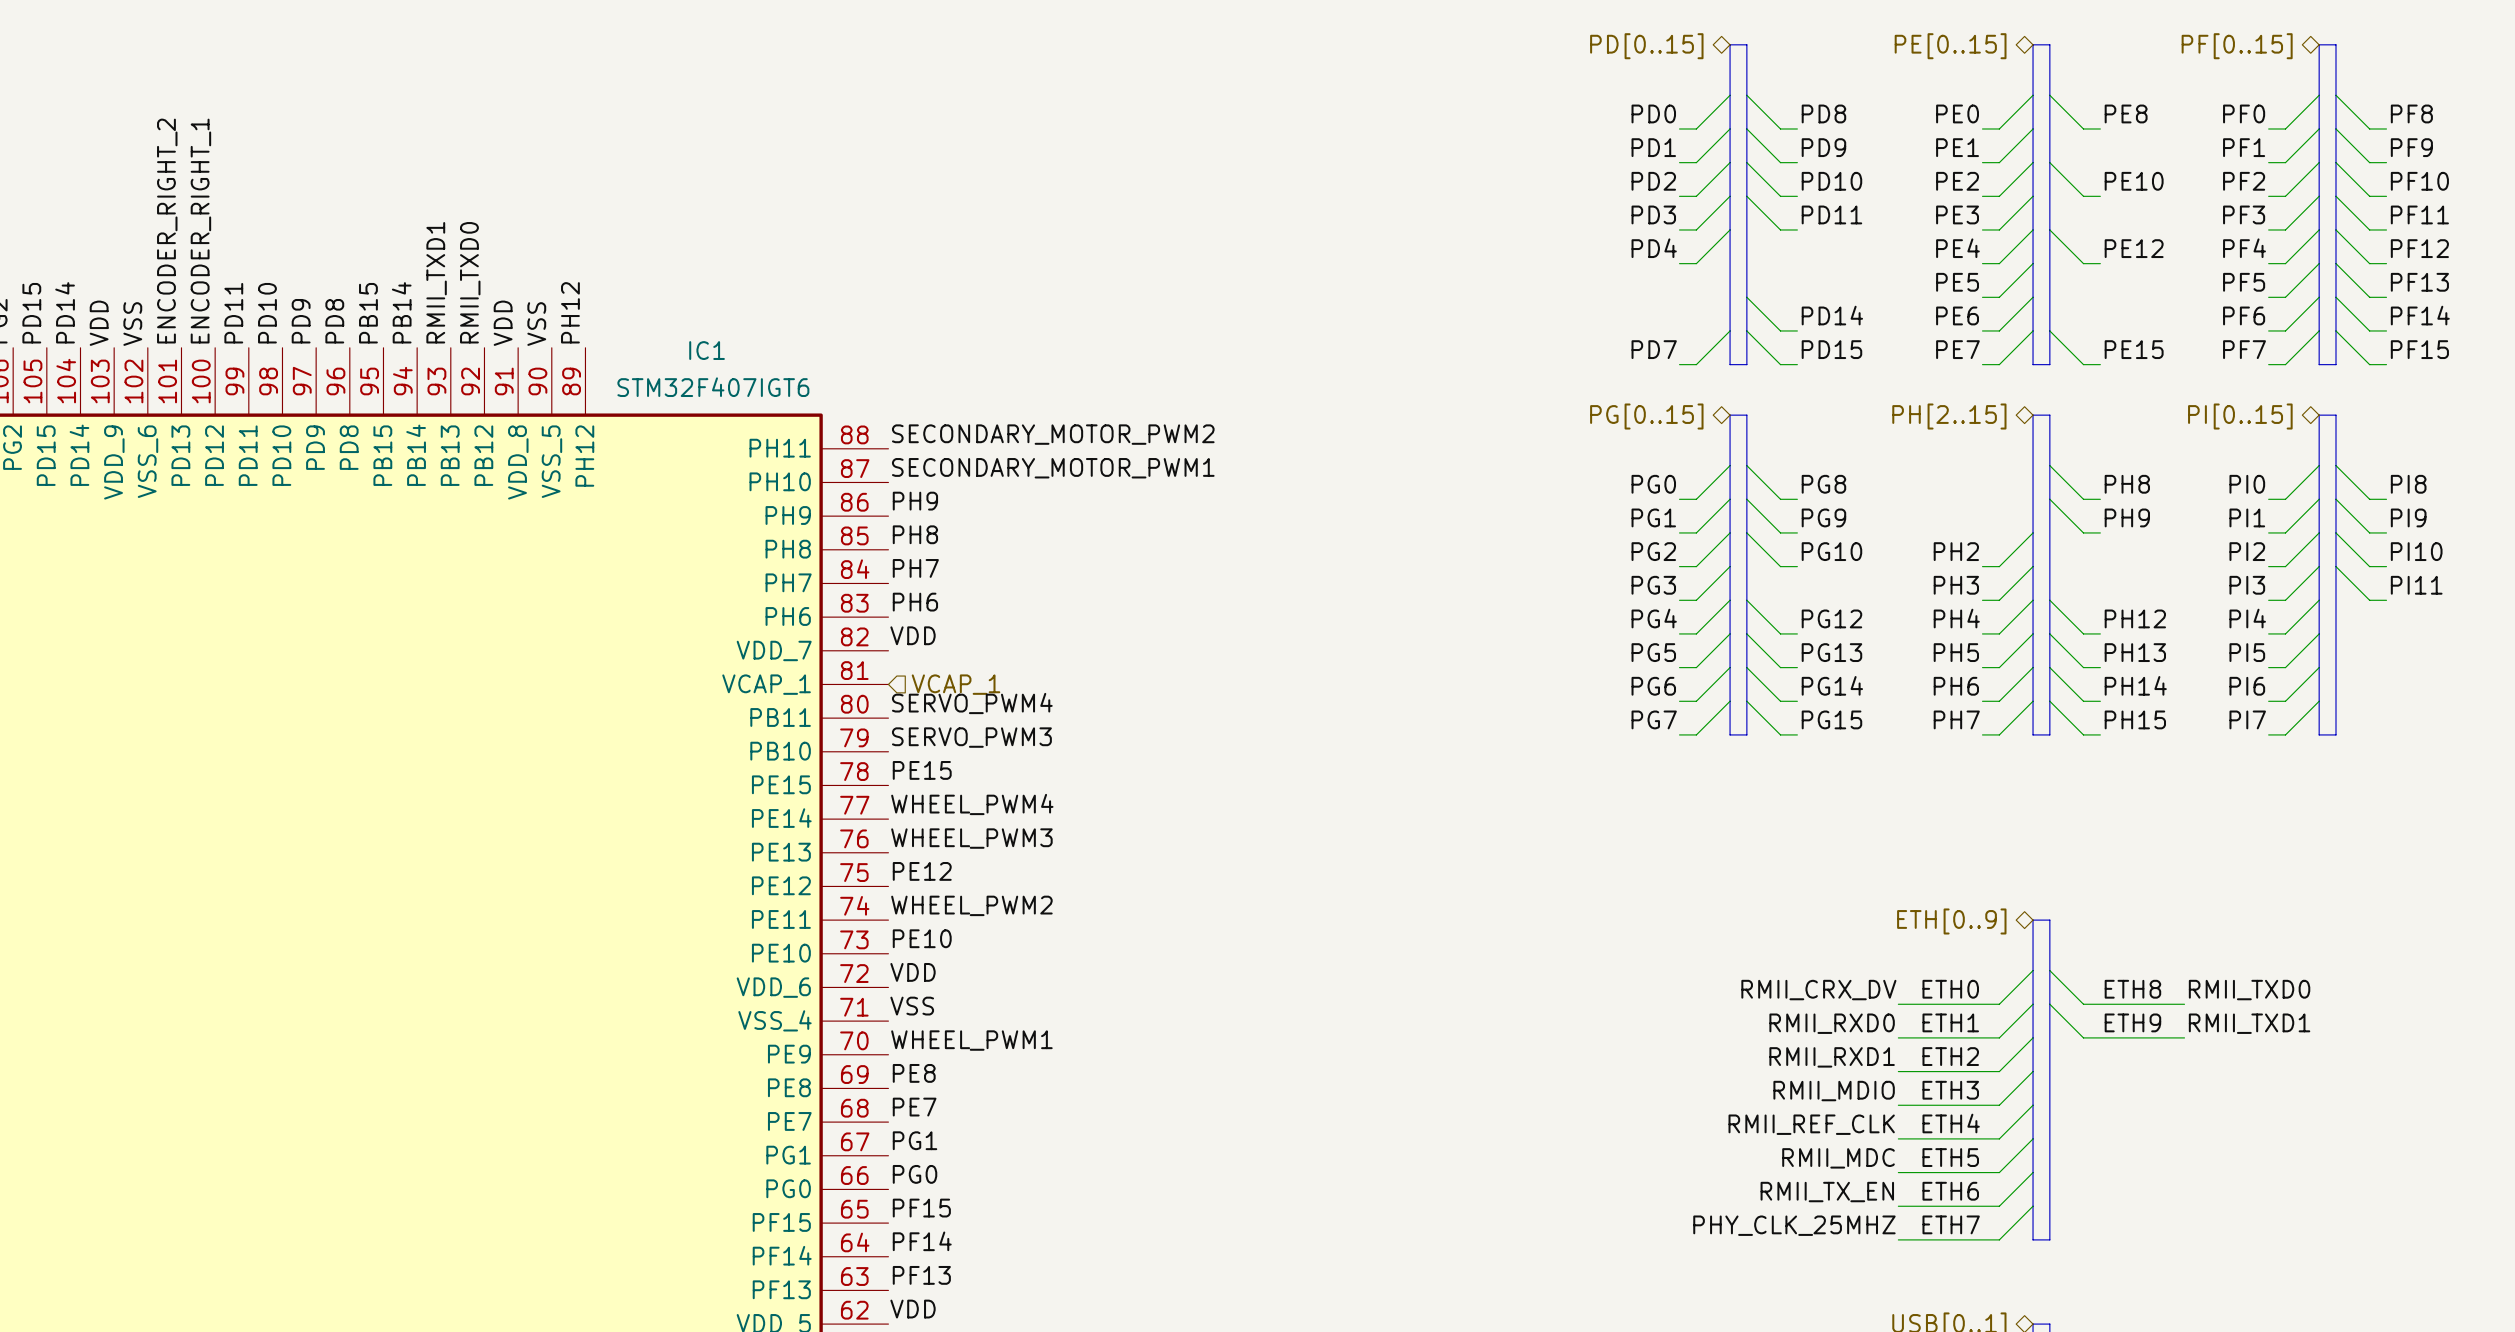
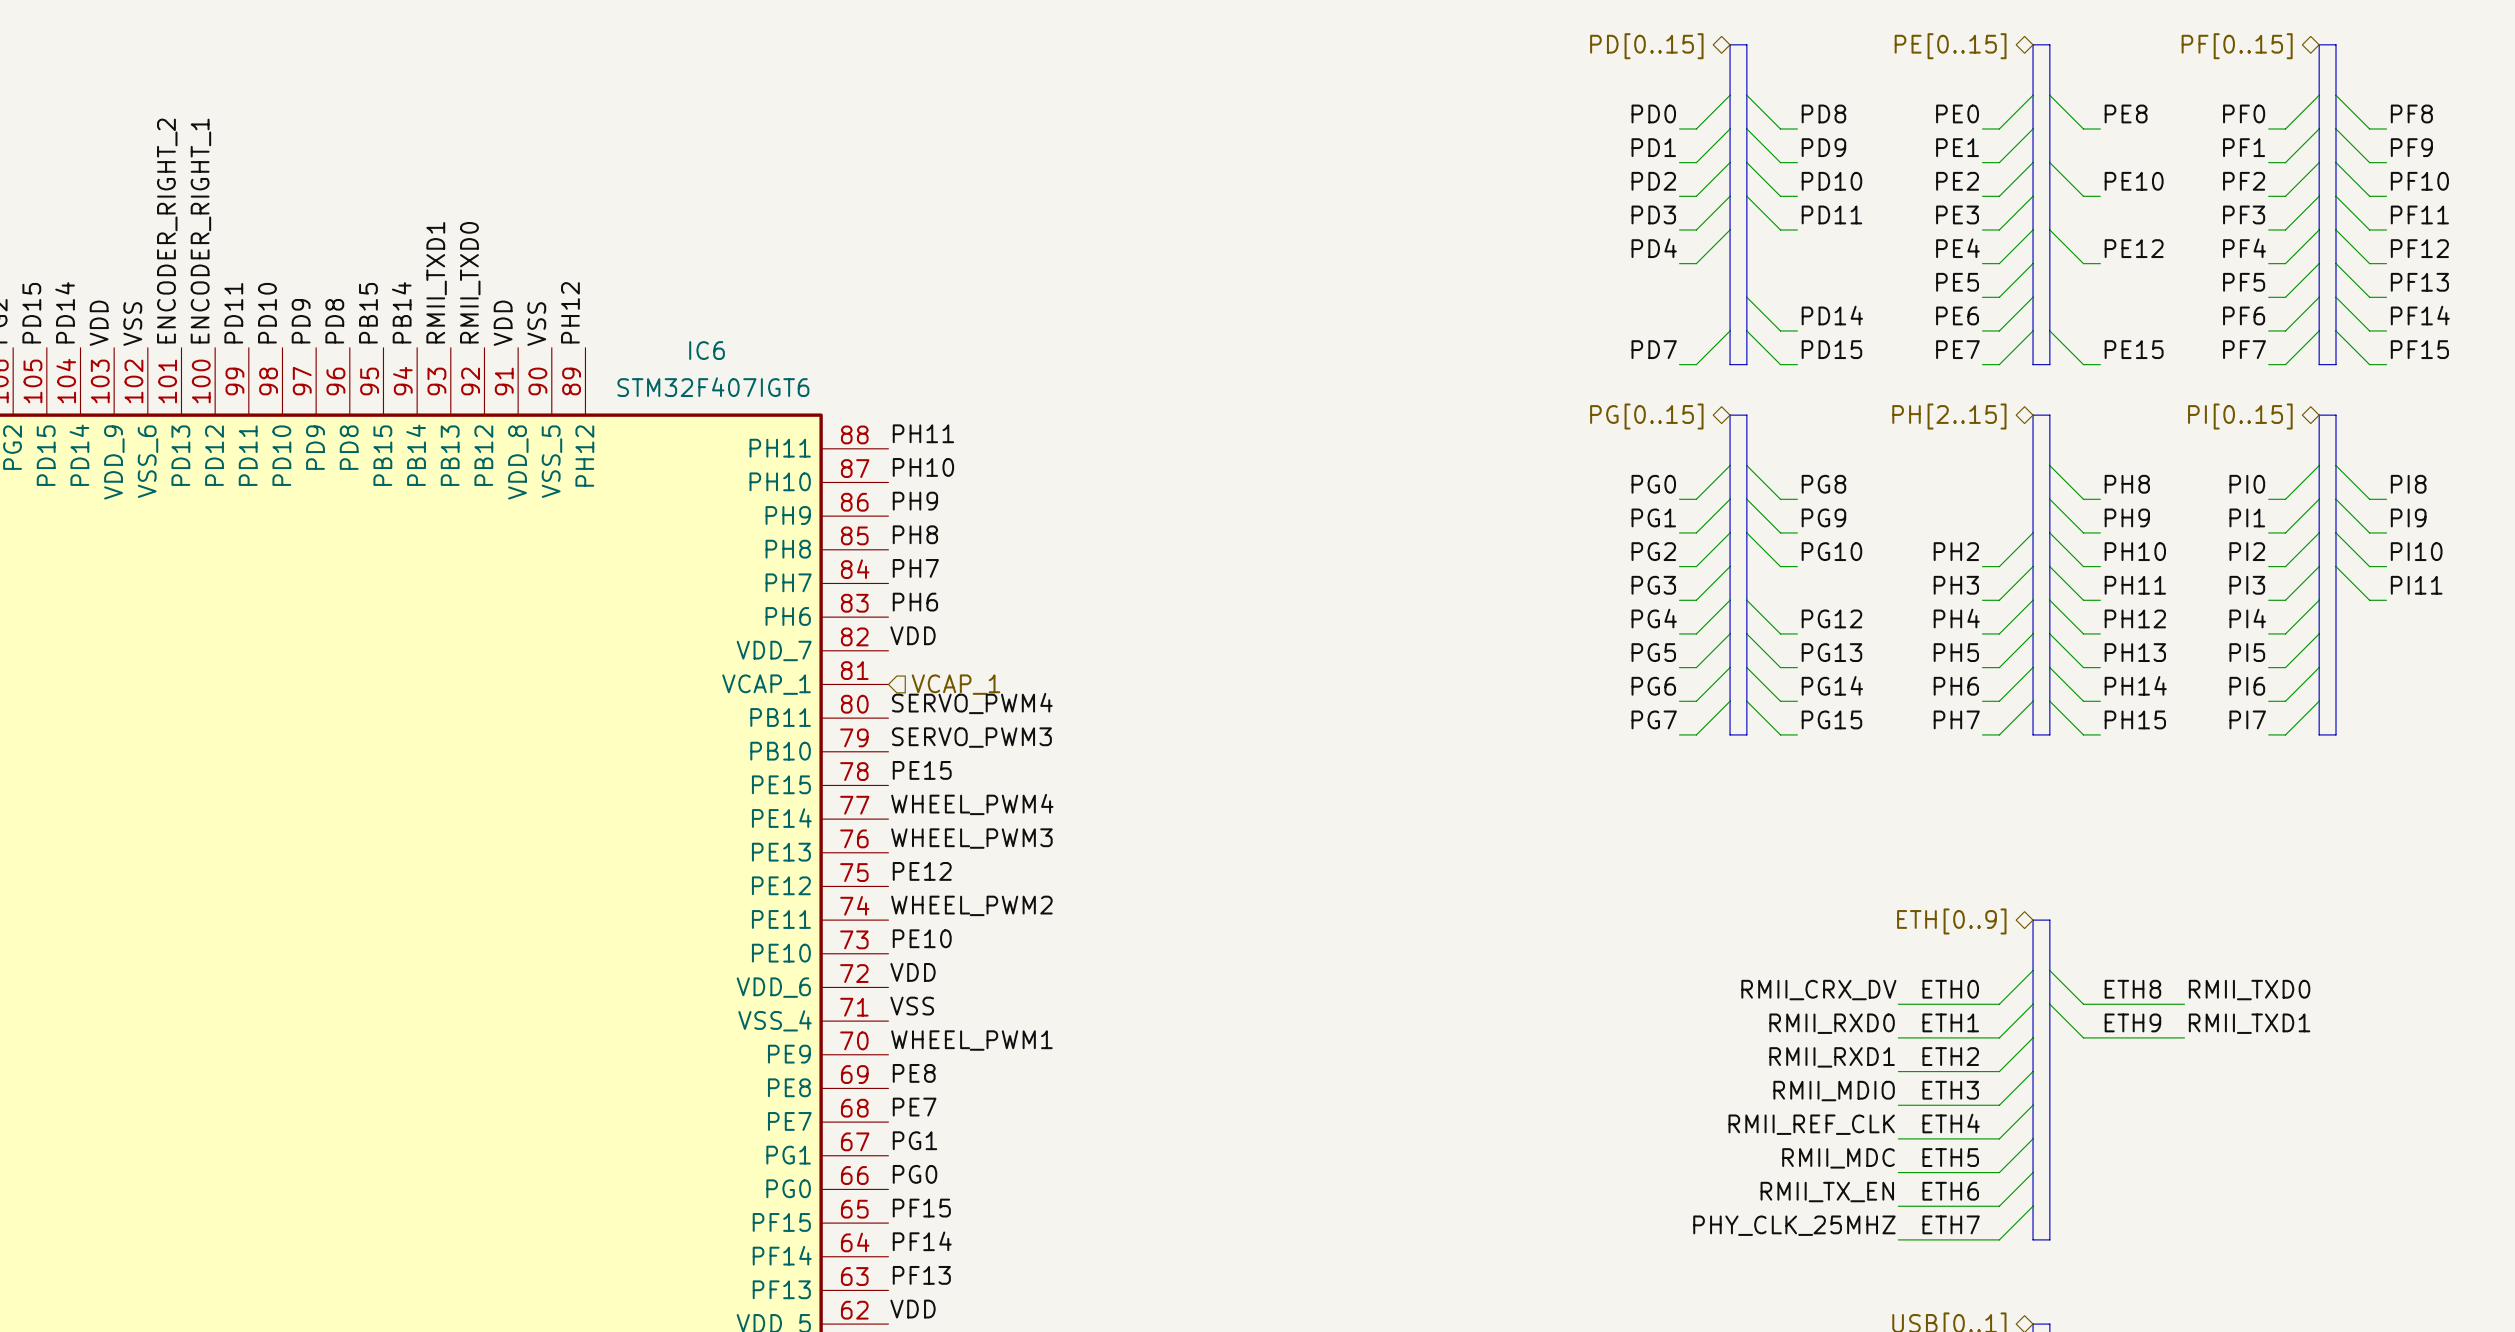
IC1 name: IC1 (707, 350) -> IC6 (707, 350)
label: SECONDARY_MOTOR_PWM2 (1053, 434) -> PH11 (923, 433)
label: SECONDARY_MOTOR_PWM1 (1053, 468) -> PH10 (923, 467)
wire: none -> (2049, 532) (2083, 566) (2100, 566)
label: none -> PH10 (2135, 551)
wire: none -> (2049, 566) (2083, 600) (2100, 600)
label: none -> PH11 (2135, 585)

